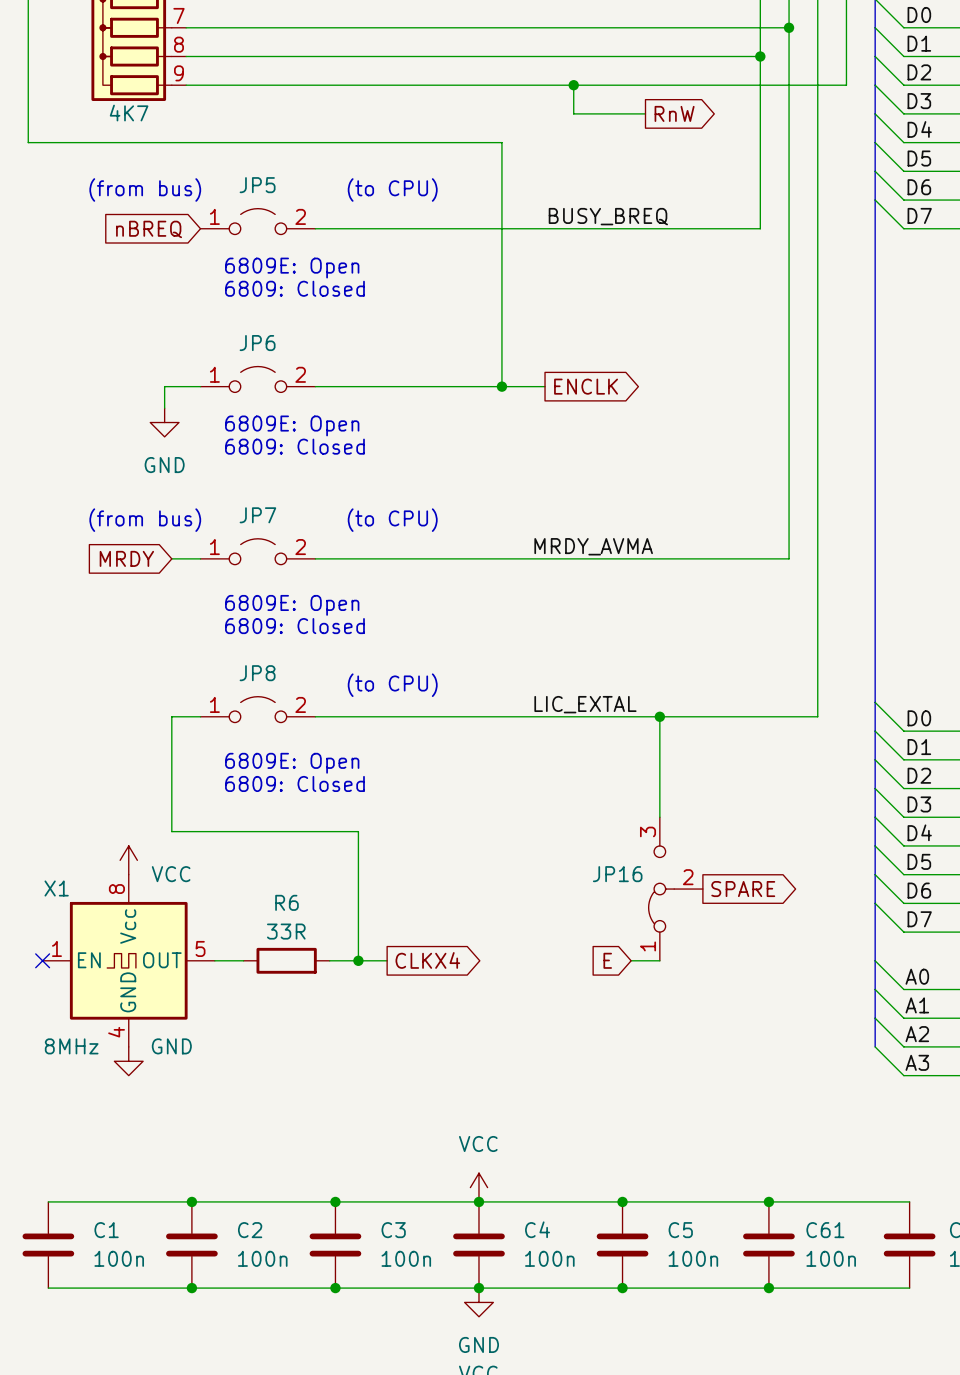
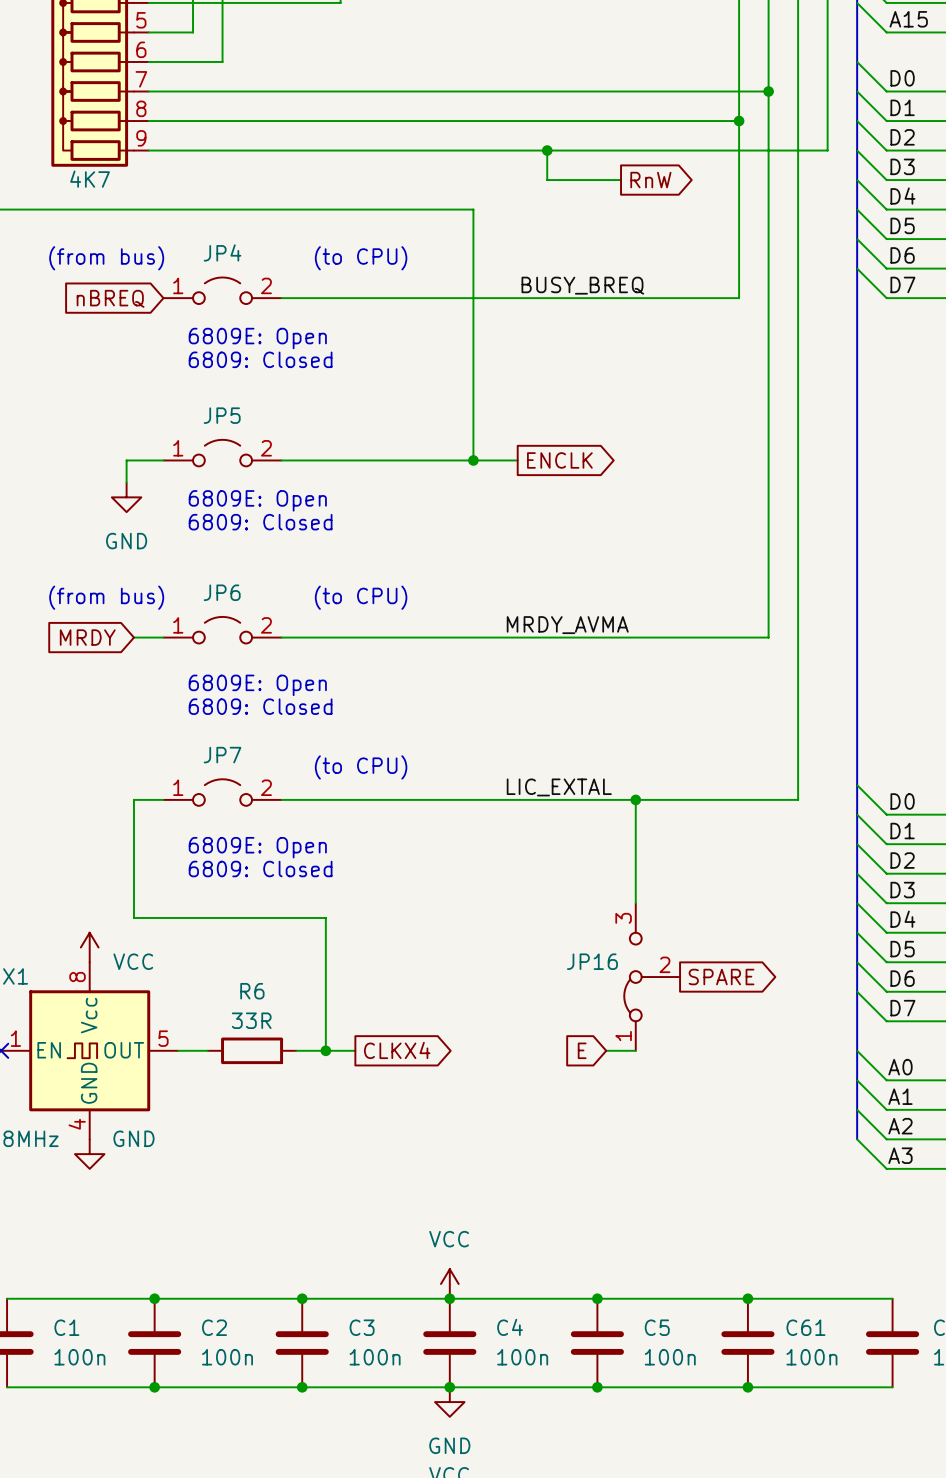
JP5 name: JP5 (257, 185) -> JP4 (222, 252)
JP6 name: JP6 (257, 343) -> JP5 (222, 415)
JP7 name: JP7 (257, 515) -> JP6 (222, 592)
JP8 name: JP8 (257, 673) -> JP7 (222, 755)

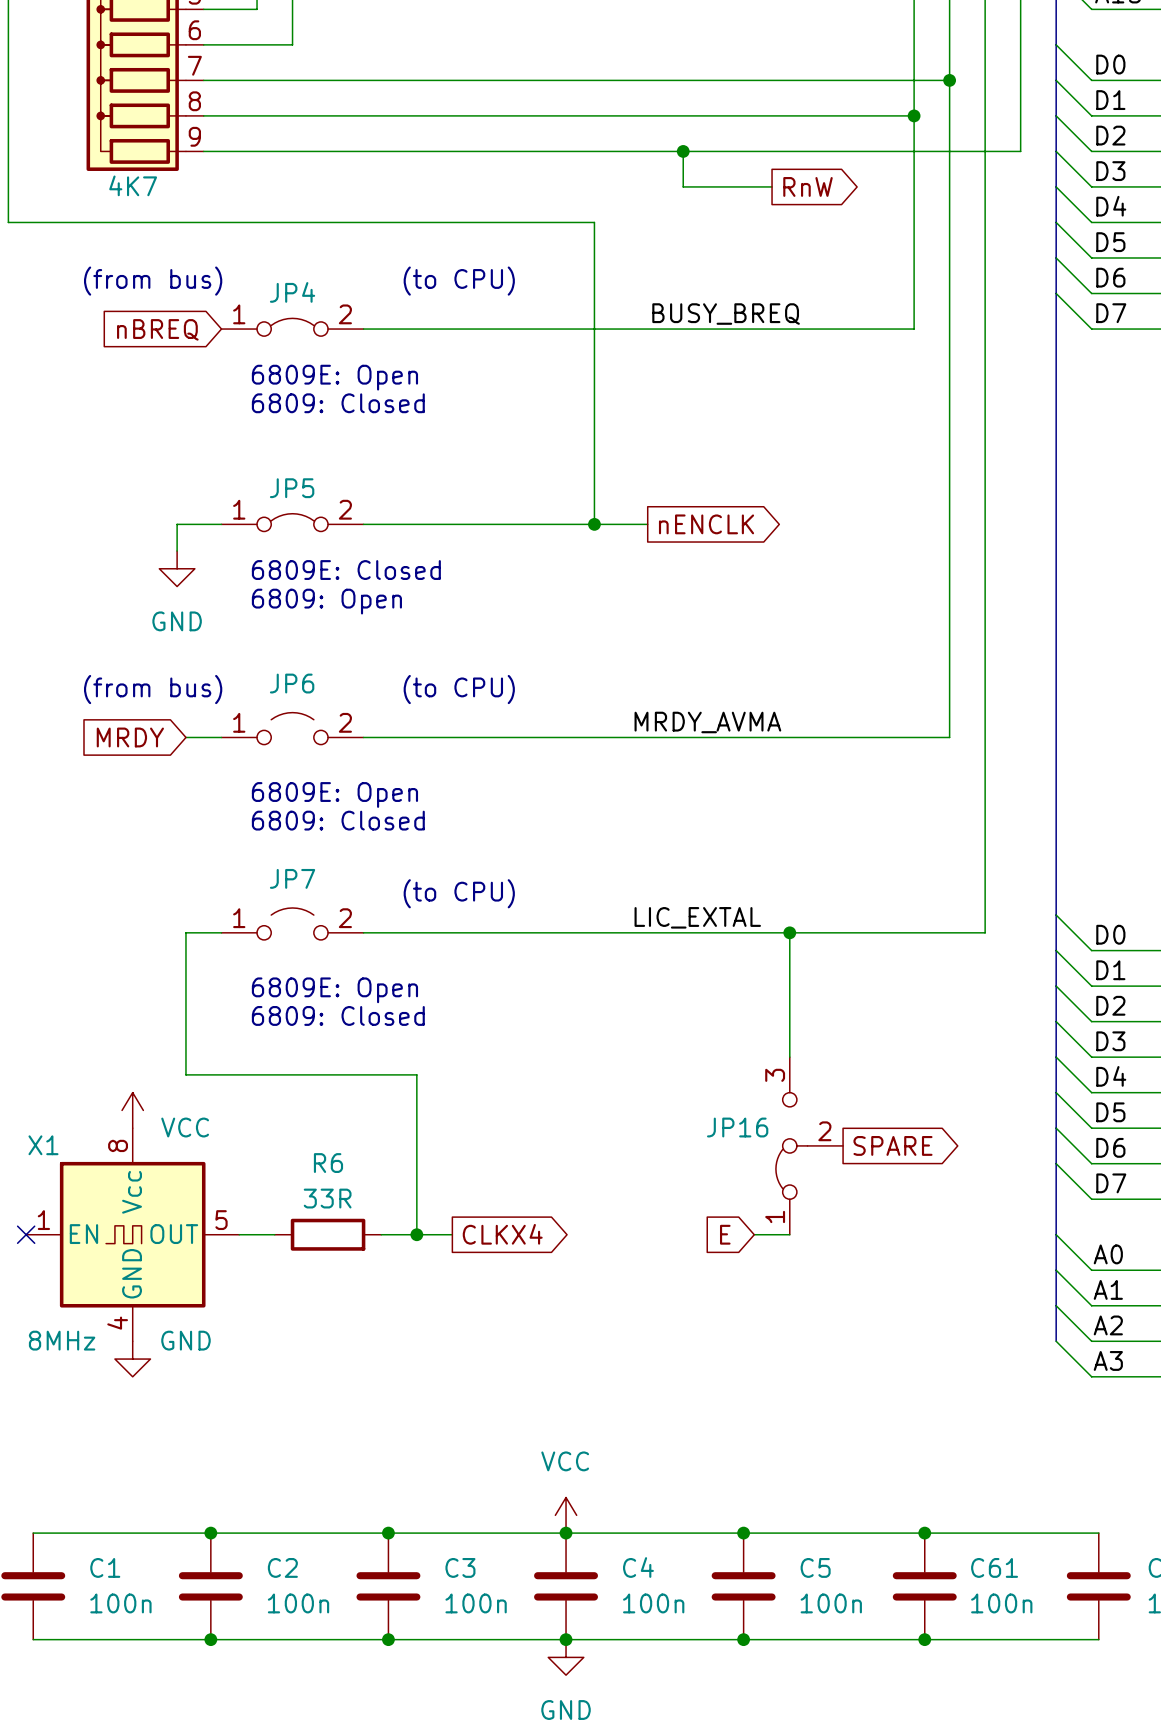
JP4 symbol: [163, 277, 282, 305] -> [221, 318, 364, 337]
JP5 symbol: [163, 439, 282, 467] -> [221, 513, 364, 532]
global label: ENCLK (559, 460) -> nENCLK (706, 524)
text: 6809E: Open (257, 500) -> 6809E: Closed (346, 570)
text: 6809: Closed (260, 522) -> 6809: Open (326, 601)

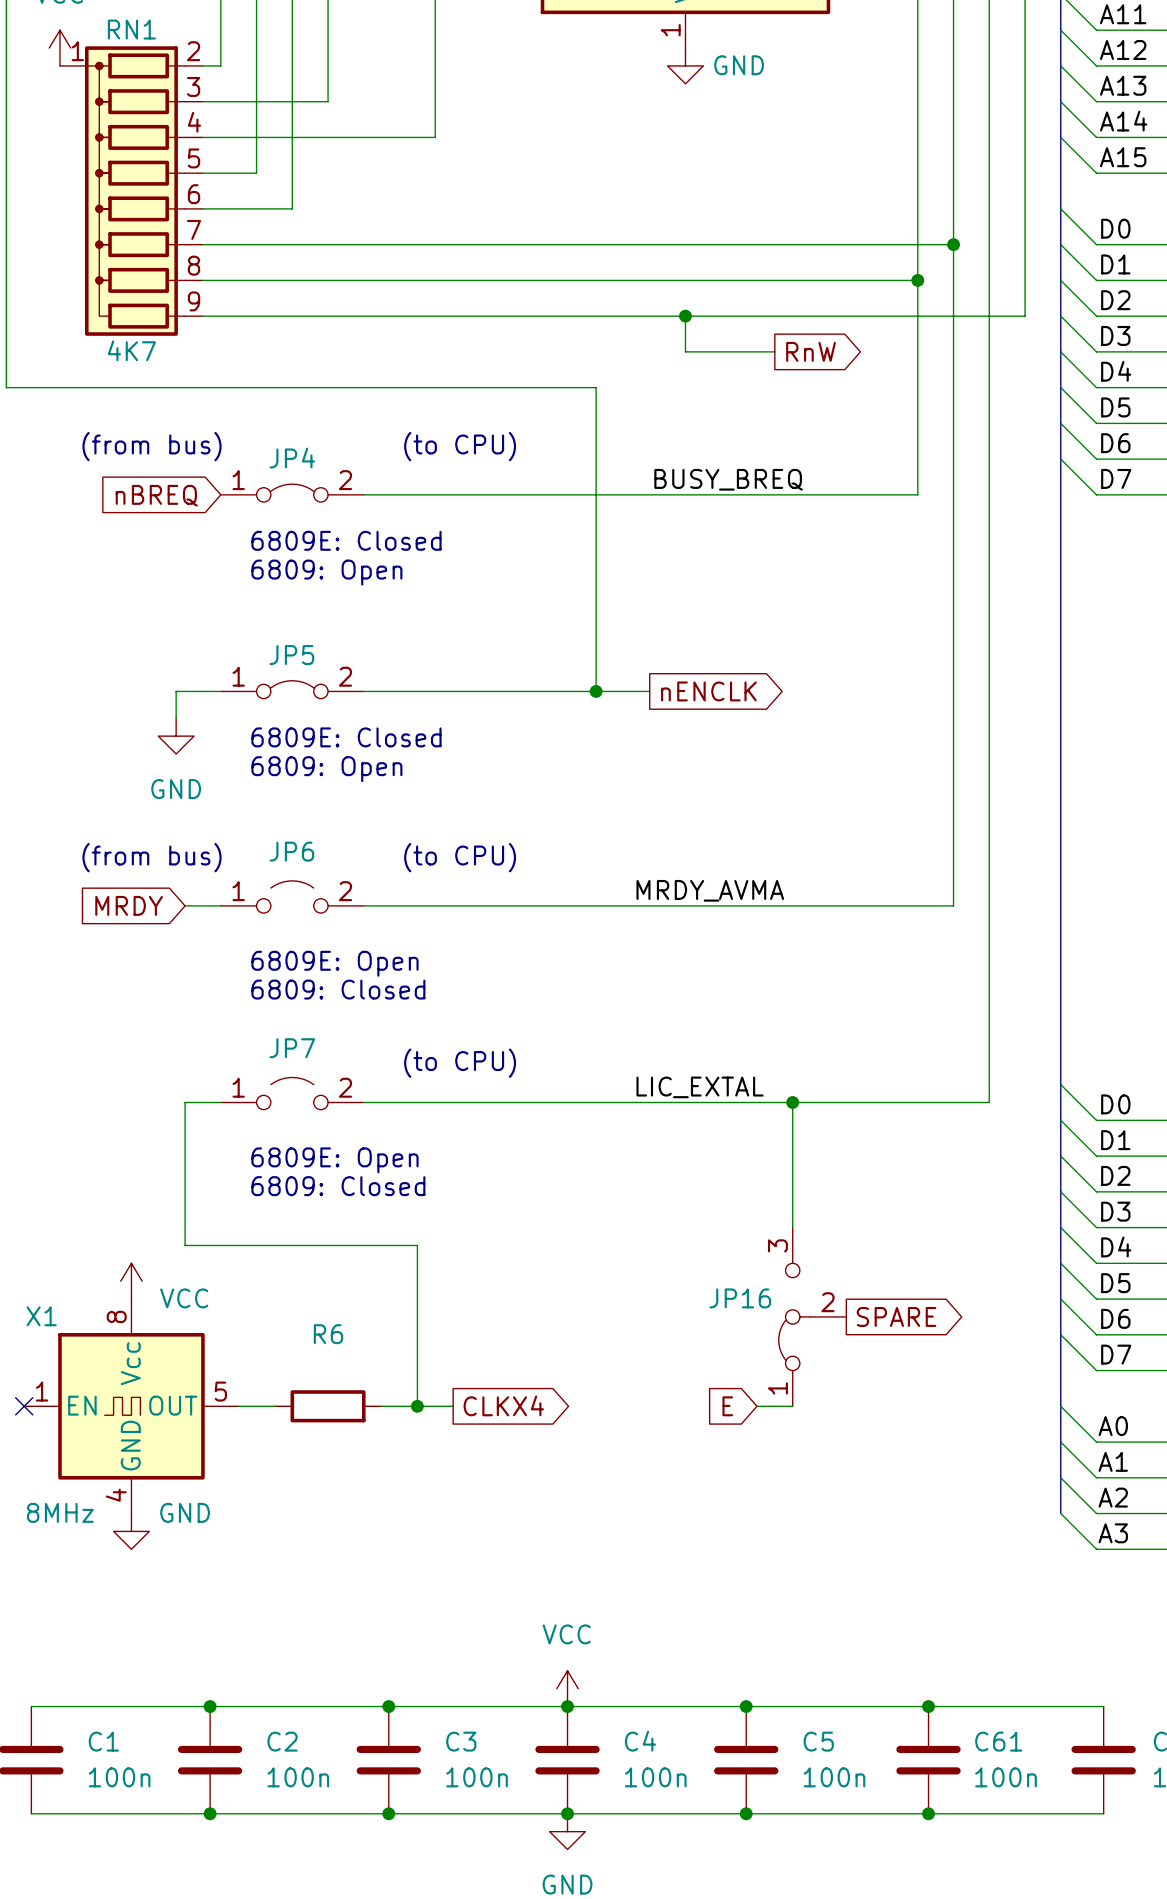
text: 6809E: Open (334, 377) -> 6809E: Closed (346, 540)
text: 6809: Closed (338, 403) -> 6809: Open (326, 572)
R6 value: 33R (327, 1198) -> none

